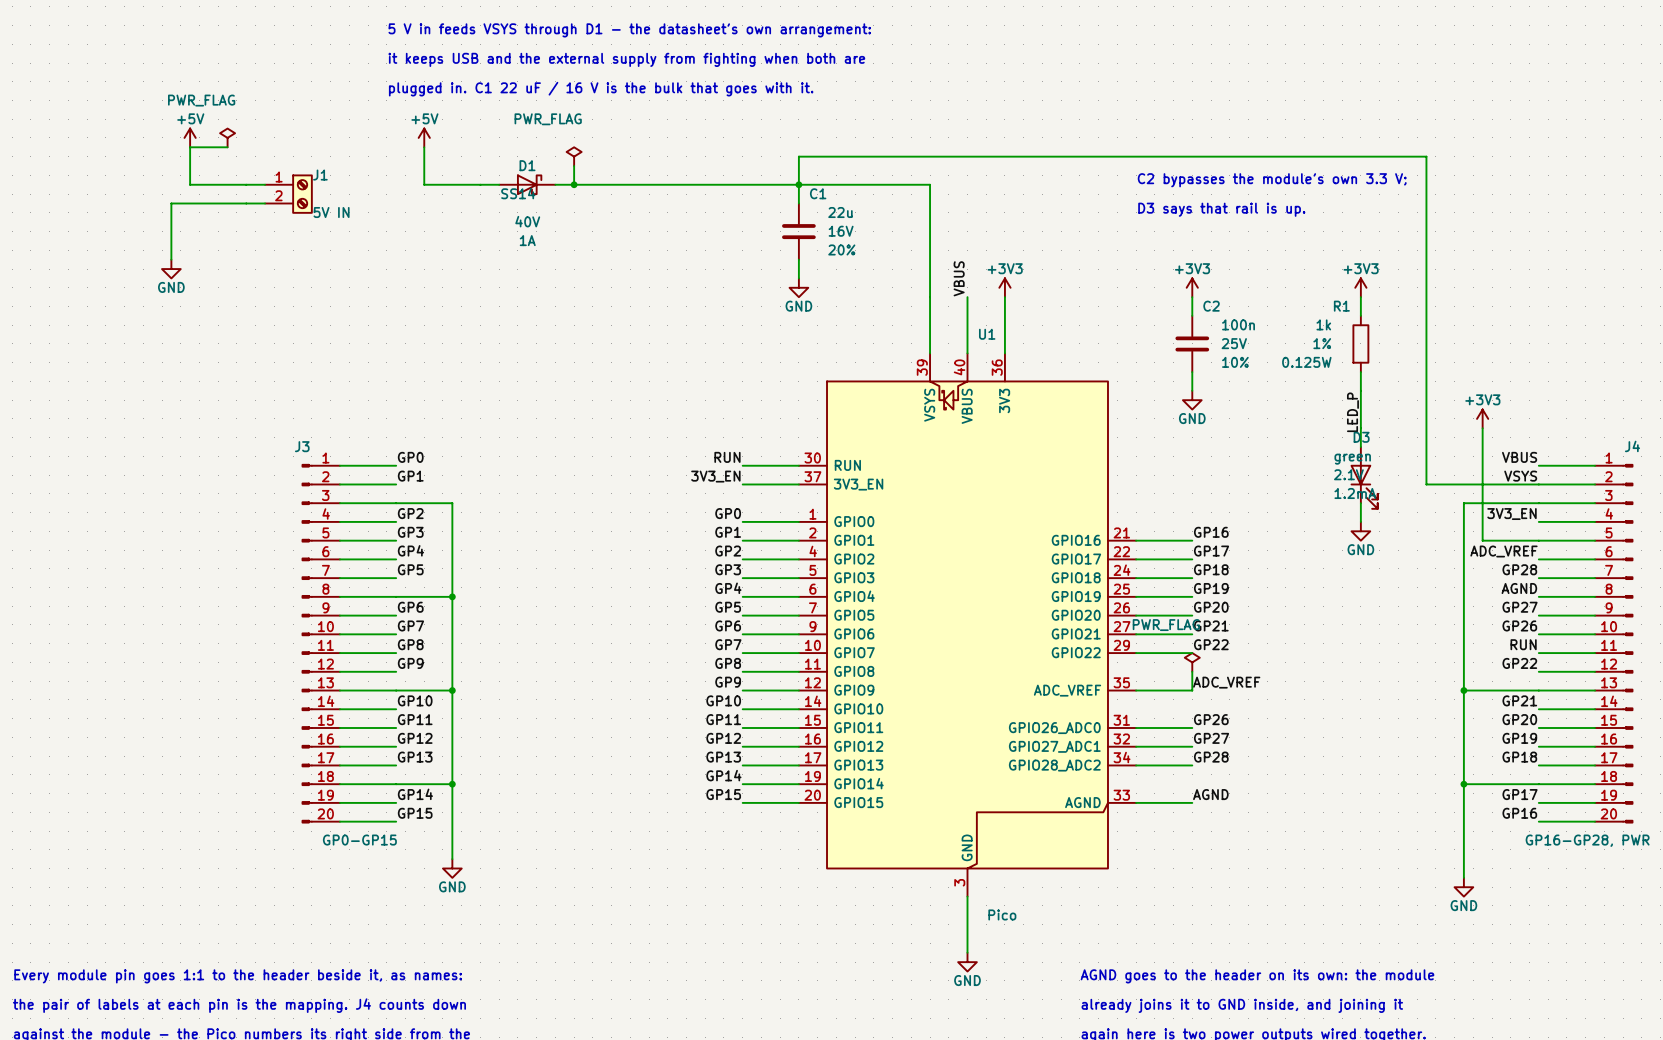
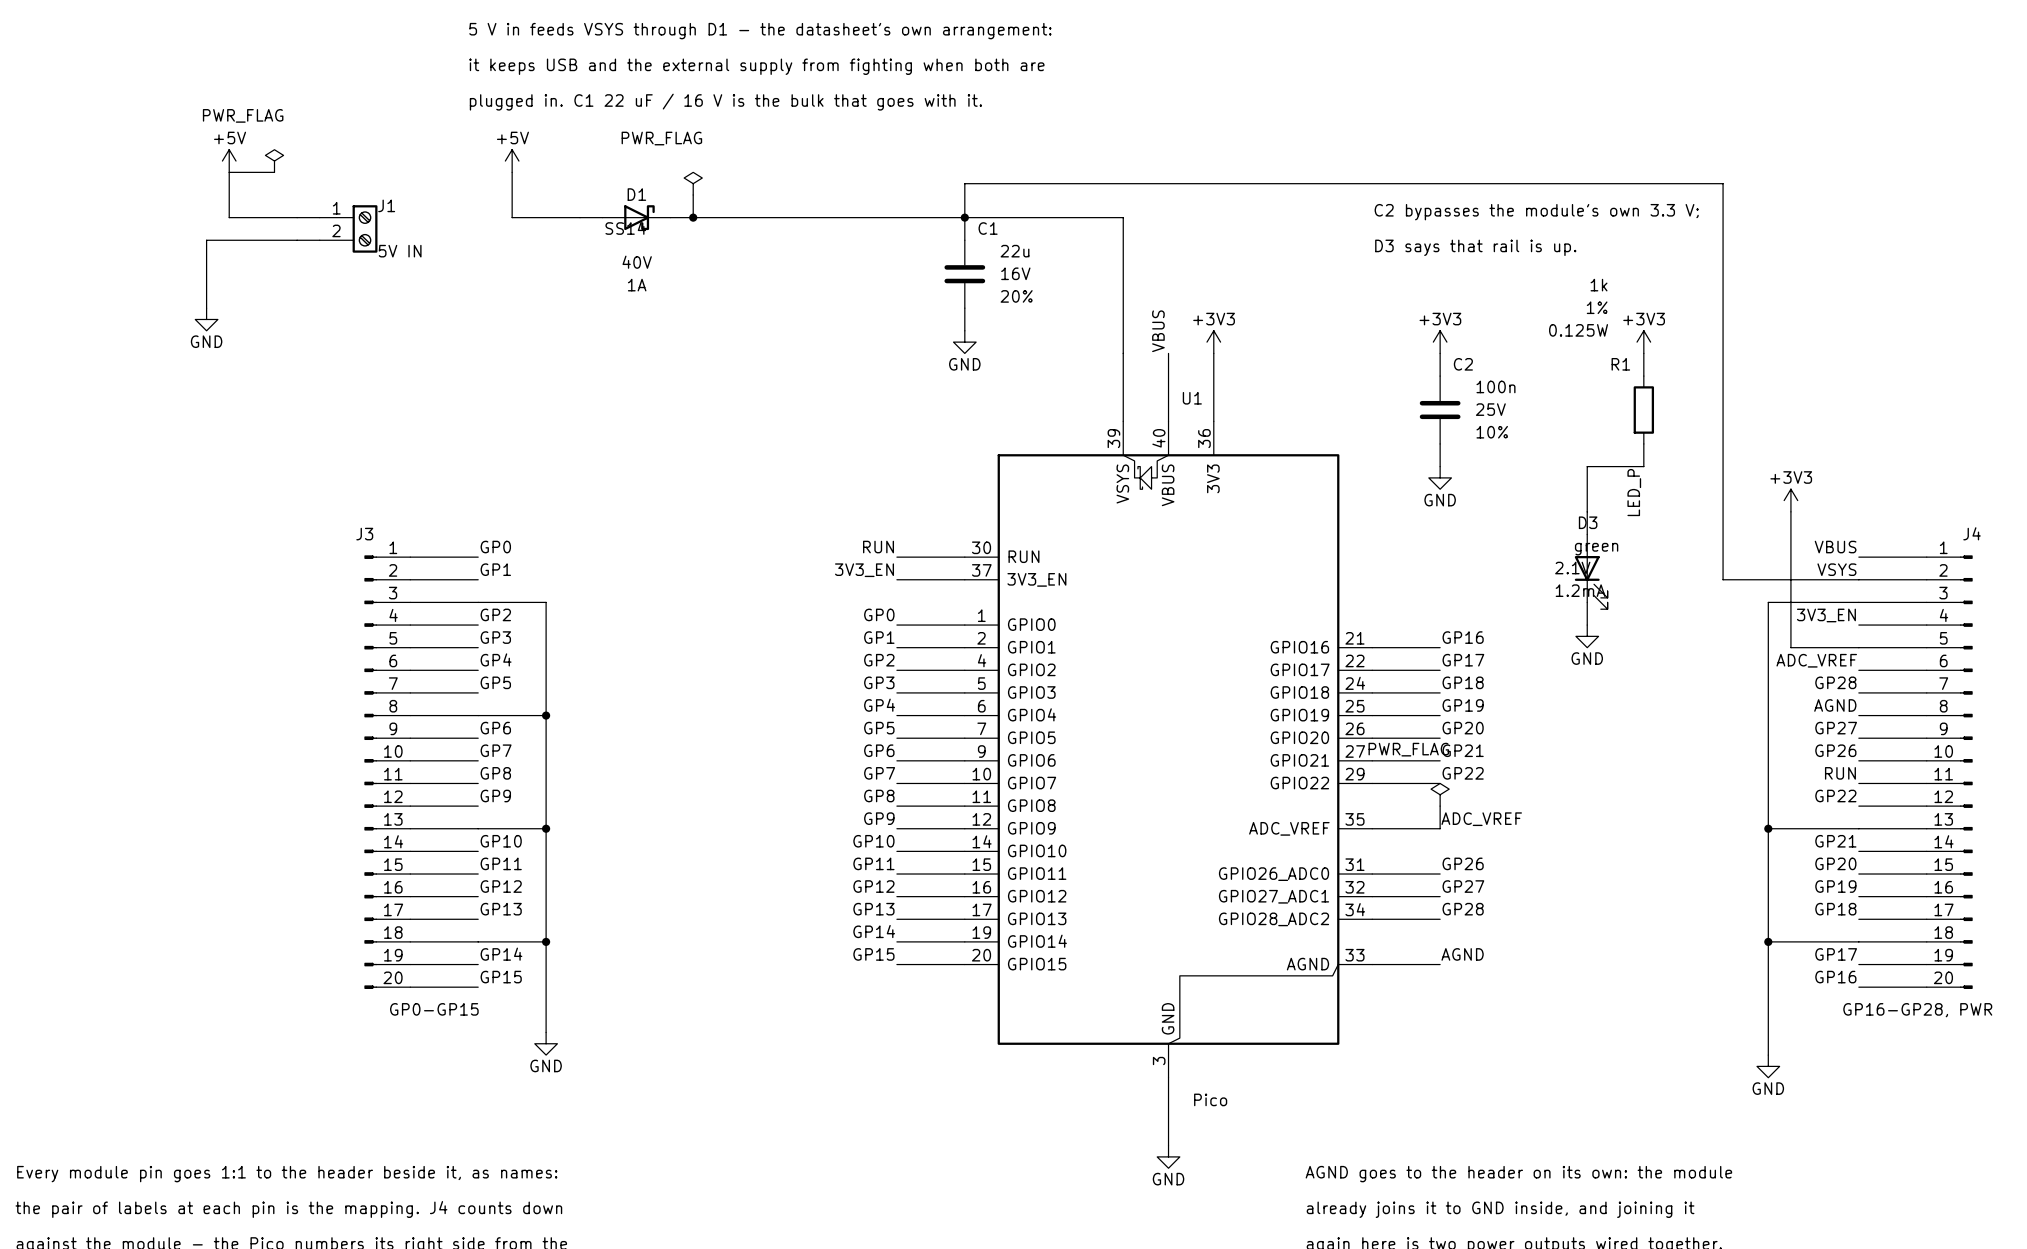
R1 value position: 1k (1323, 324) -> 1k (1599, 285)
R1 text position: 1% (1322, 343) -> 1% (1597, 307)
R1 text position: 0.125W (1306, 362) -> 0.125W (1578, 330)
wire: (1360, 390) (1360, 447) -> (1643, 466) (1587, 466) (1587, 534)
D3 value position: green (1352, 459) -> green (1596, 549)
D3 position: (1364, 477) -> (1591, 571)
wire: (1360, 503) (1360, 521) -> (1587, 602) (1587, 625)
power symbol position: GND (1360, 531) -> GND (1587, 636)

